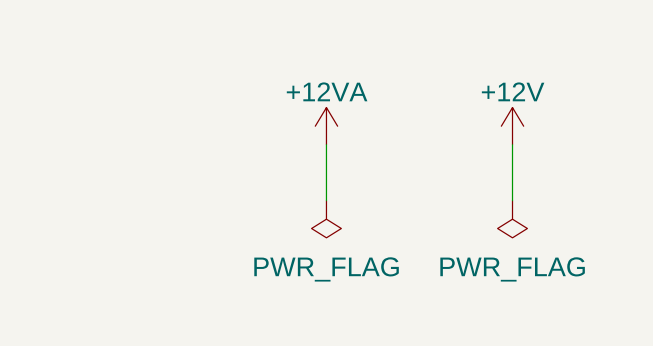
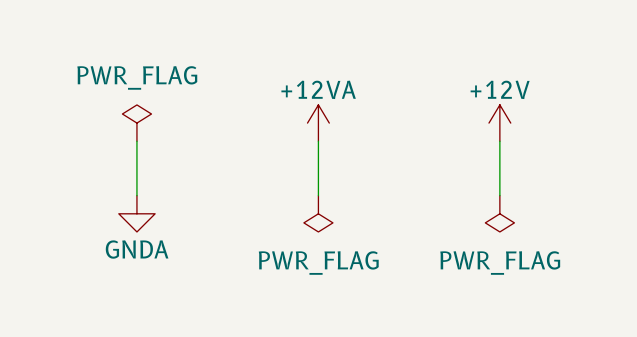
power symbol: none -> PWR_FLAG (136, 123)
wire: none -> (136, 141) (136, 195)
power symbol: none -> GNDA (136, 213)

